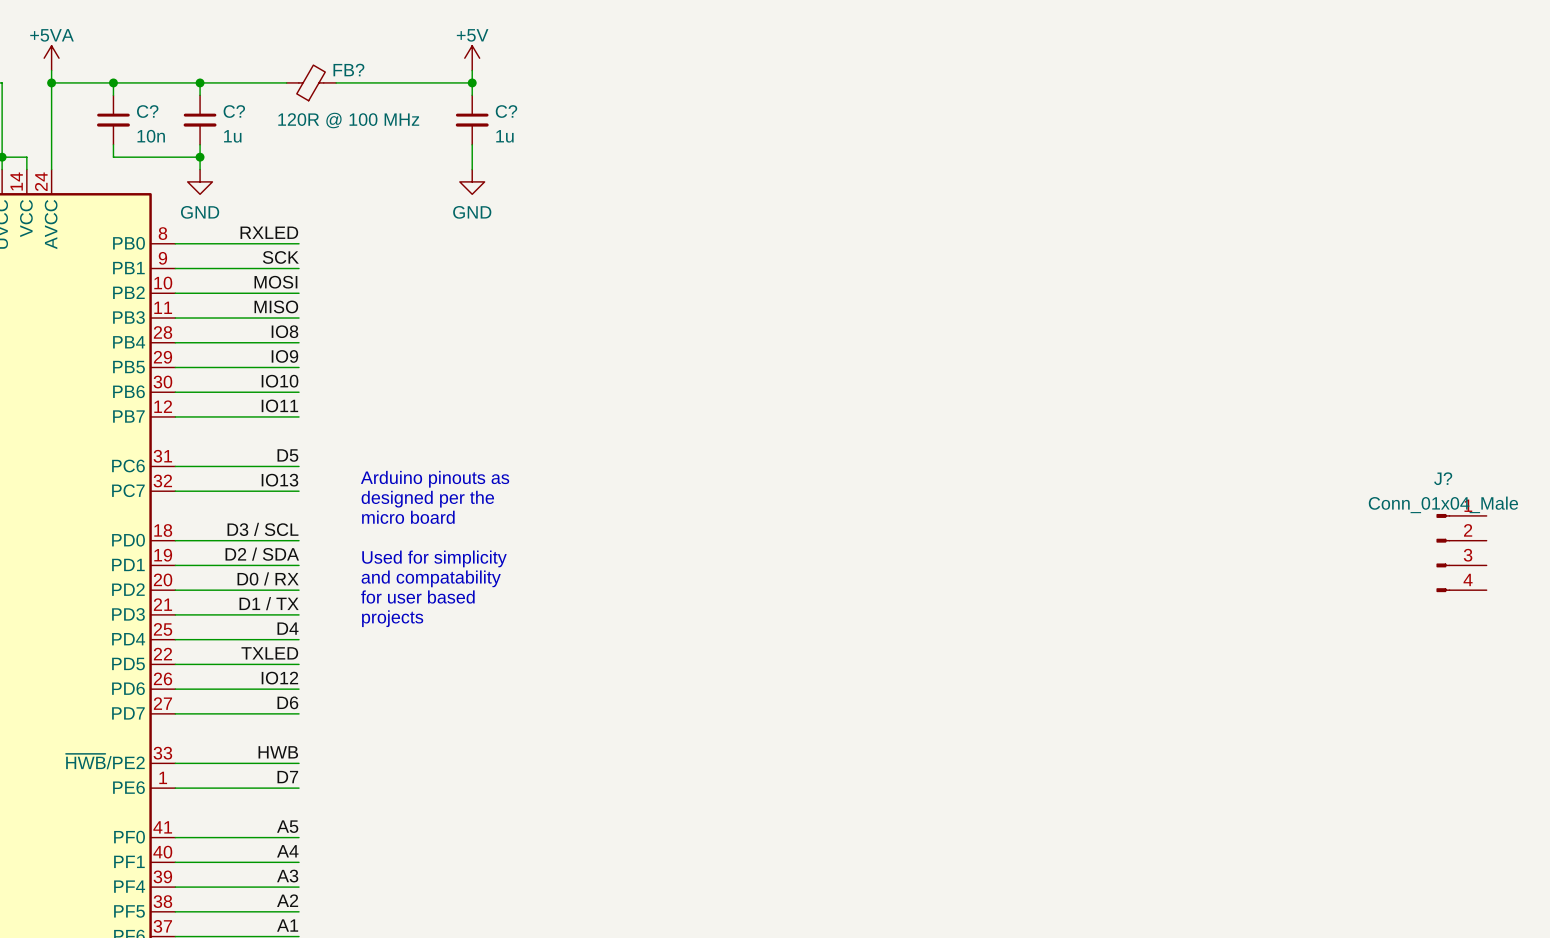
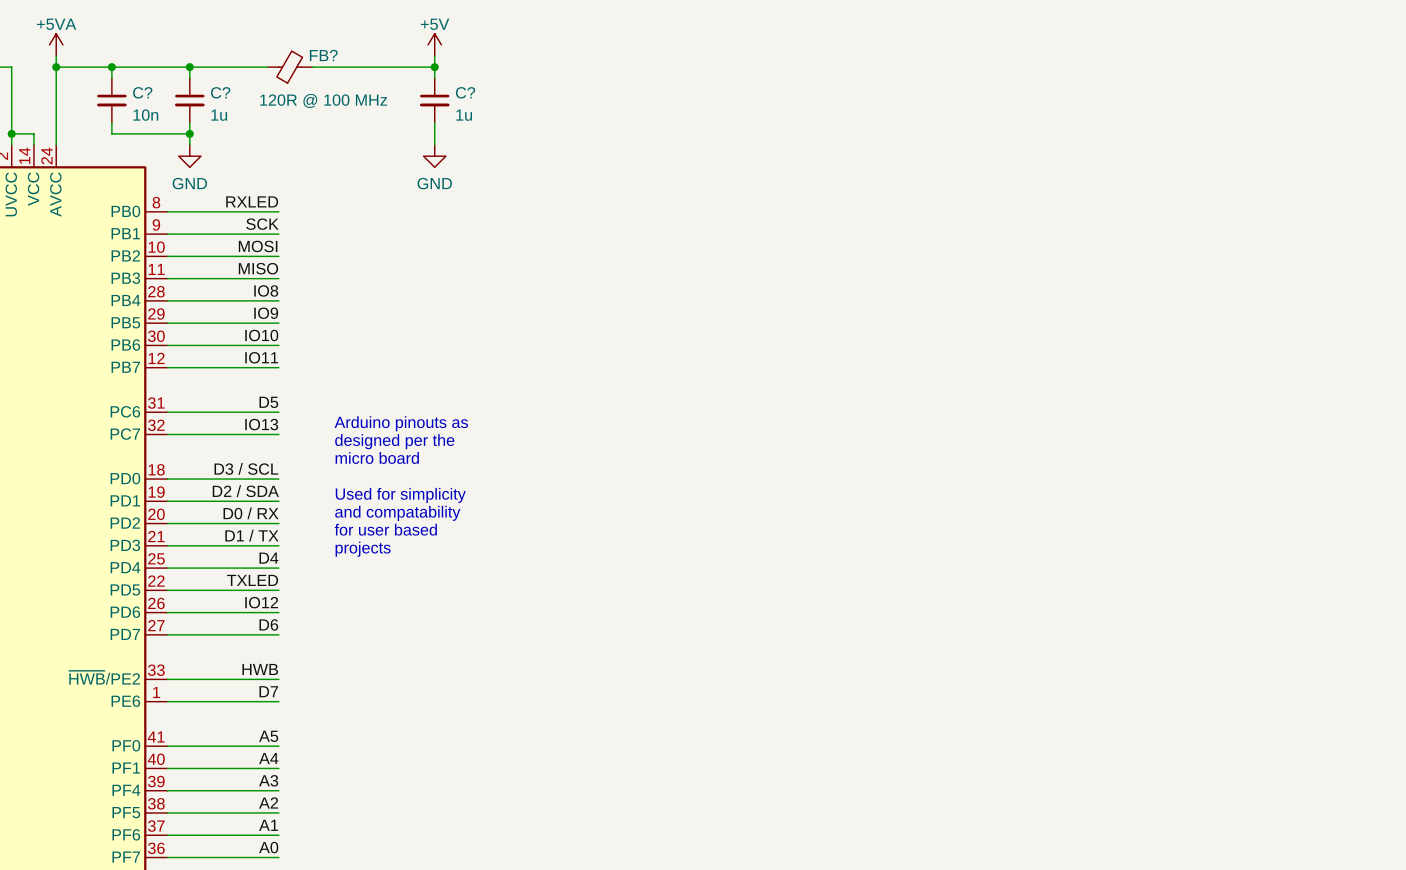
J?: Conn_01x04_Male (1461, 553) -> none

